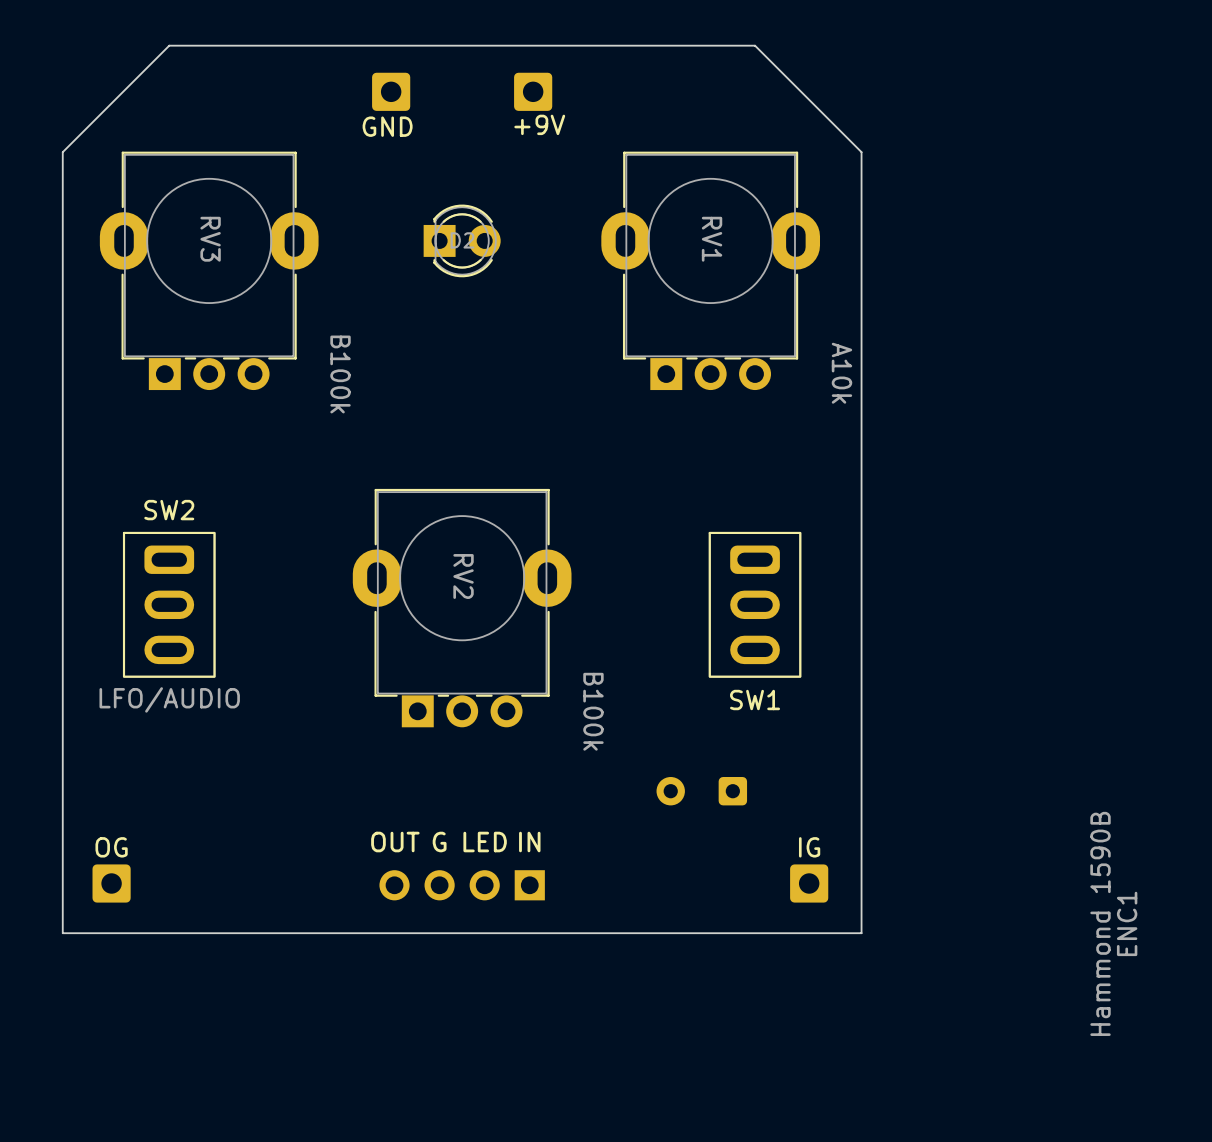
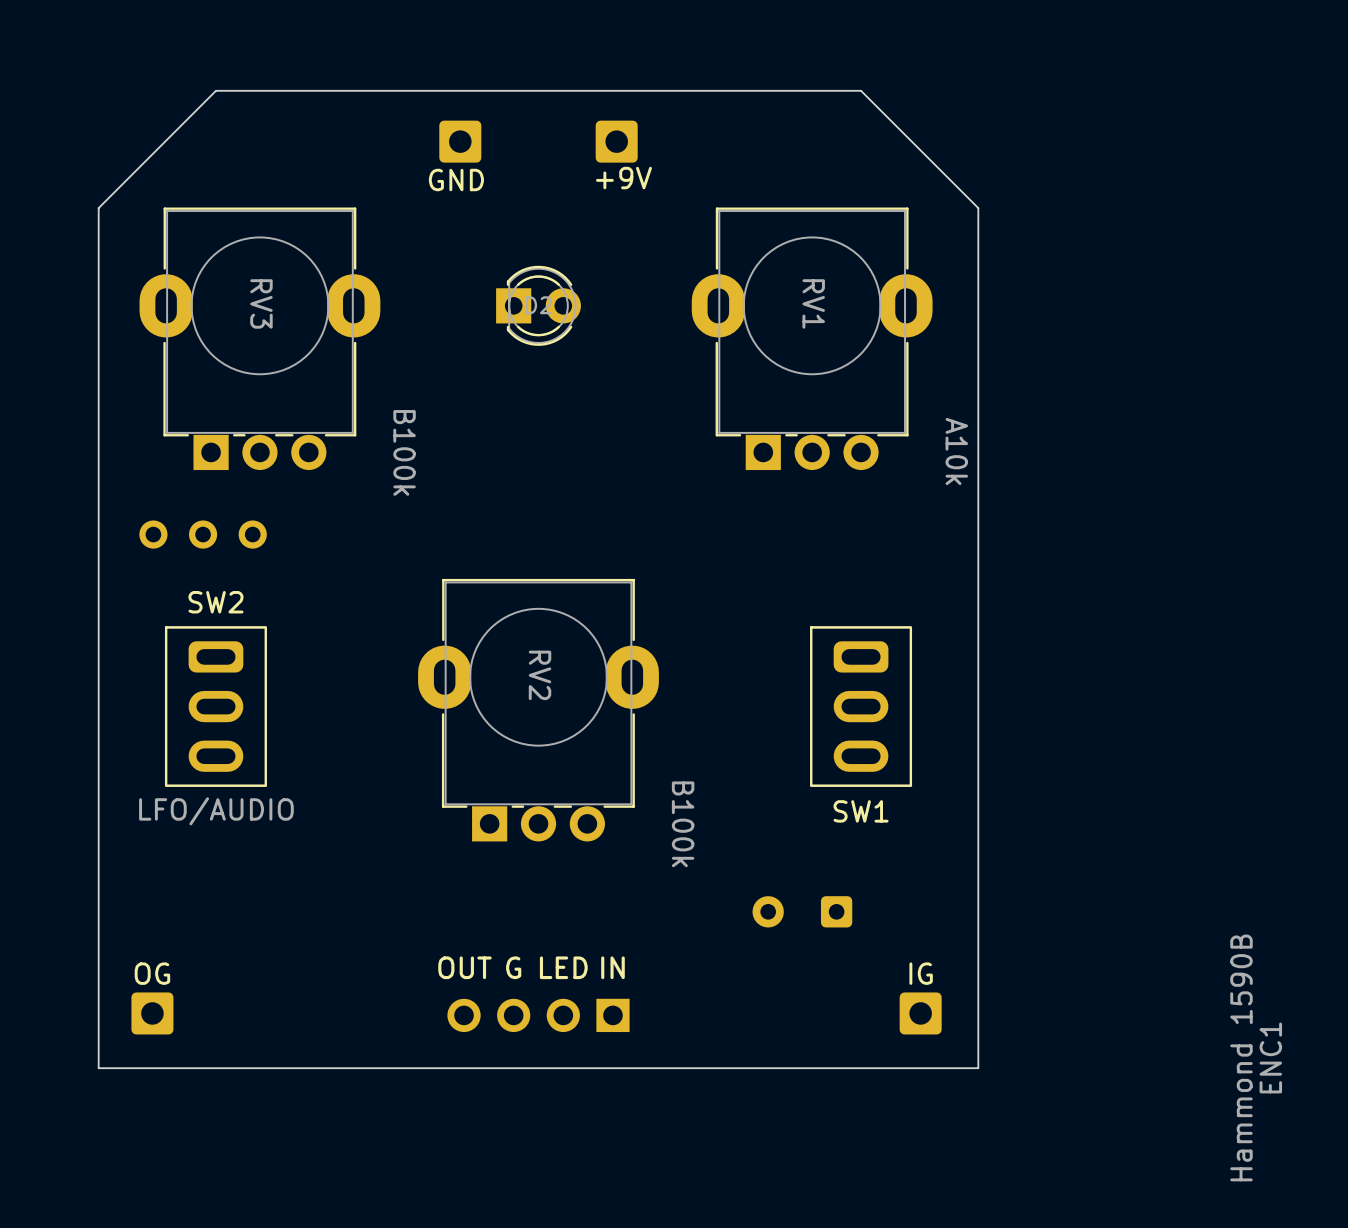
part: none -> (203, 534)

